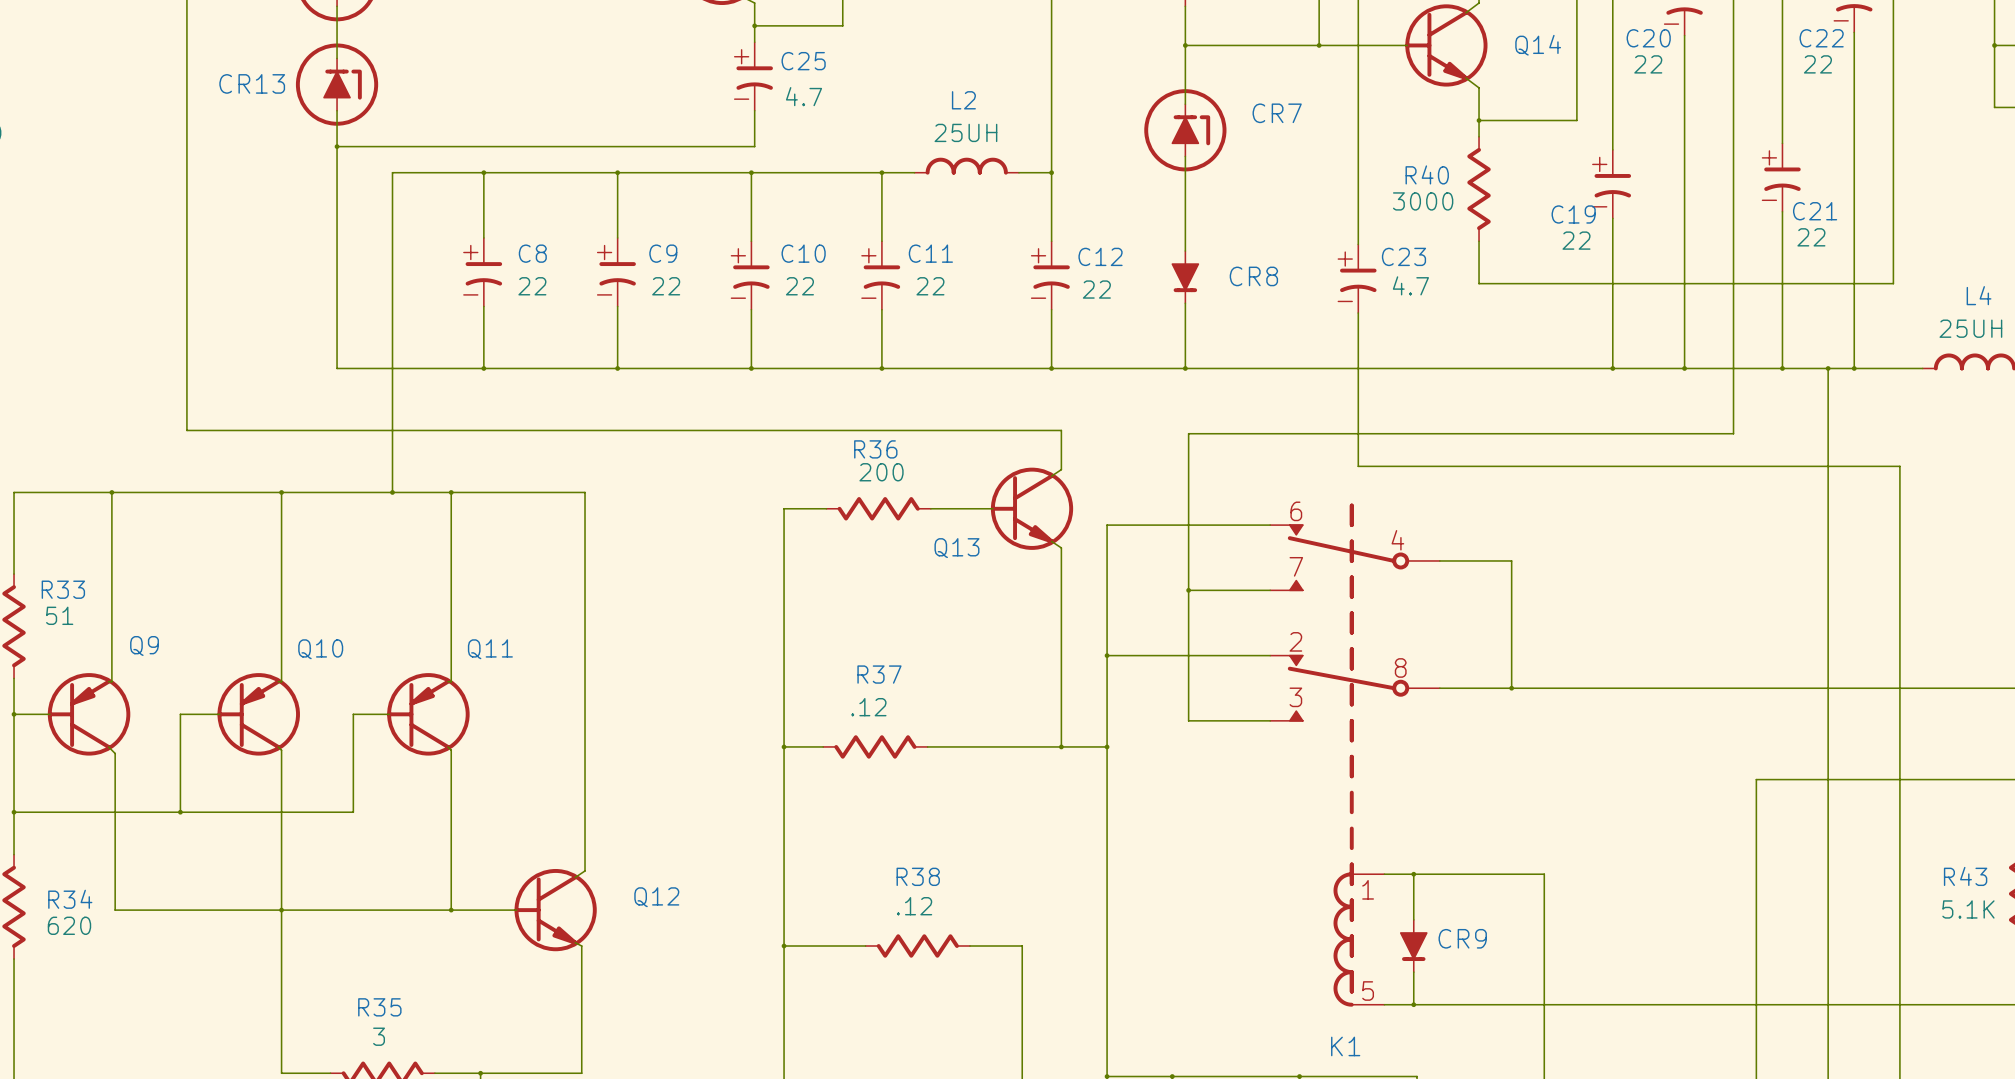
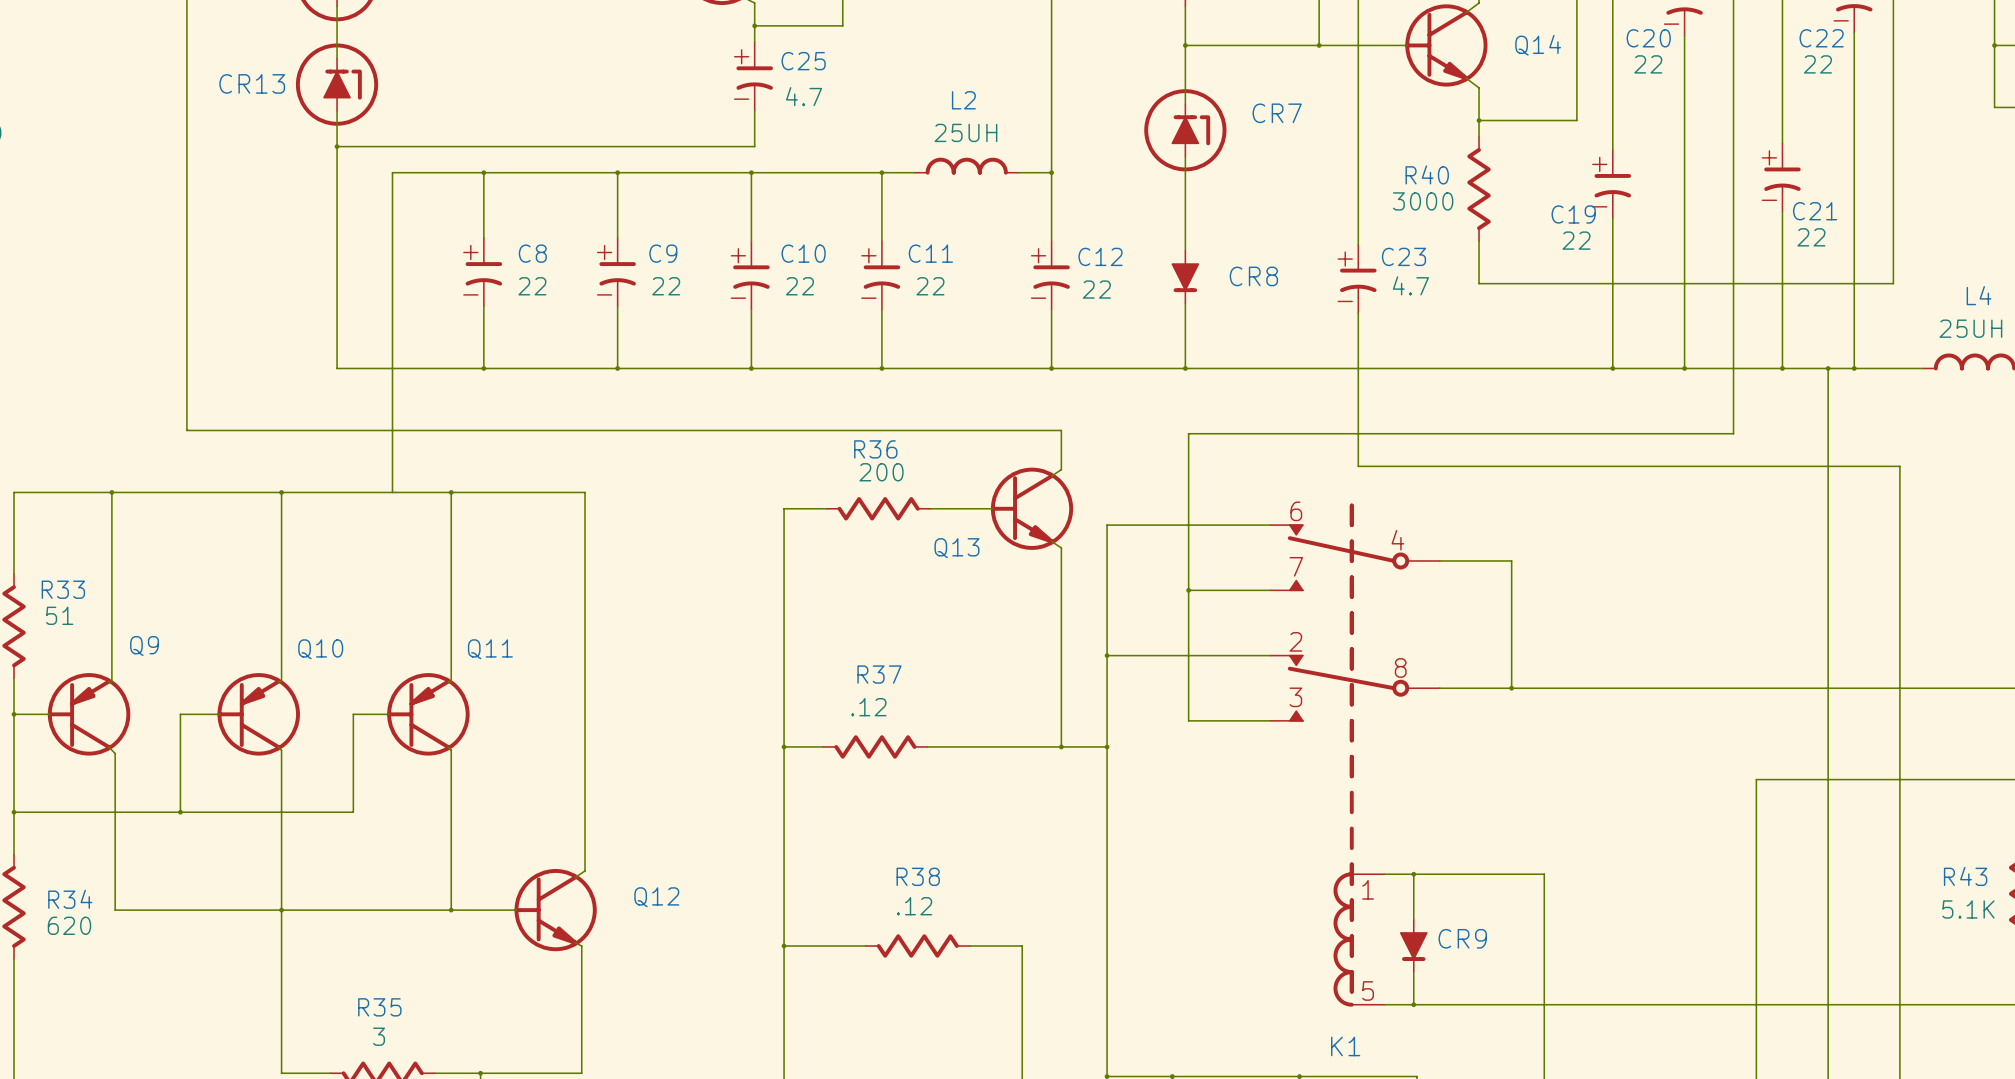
junction: (392, 492) -> none

